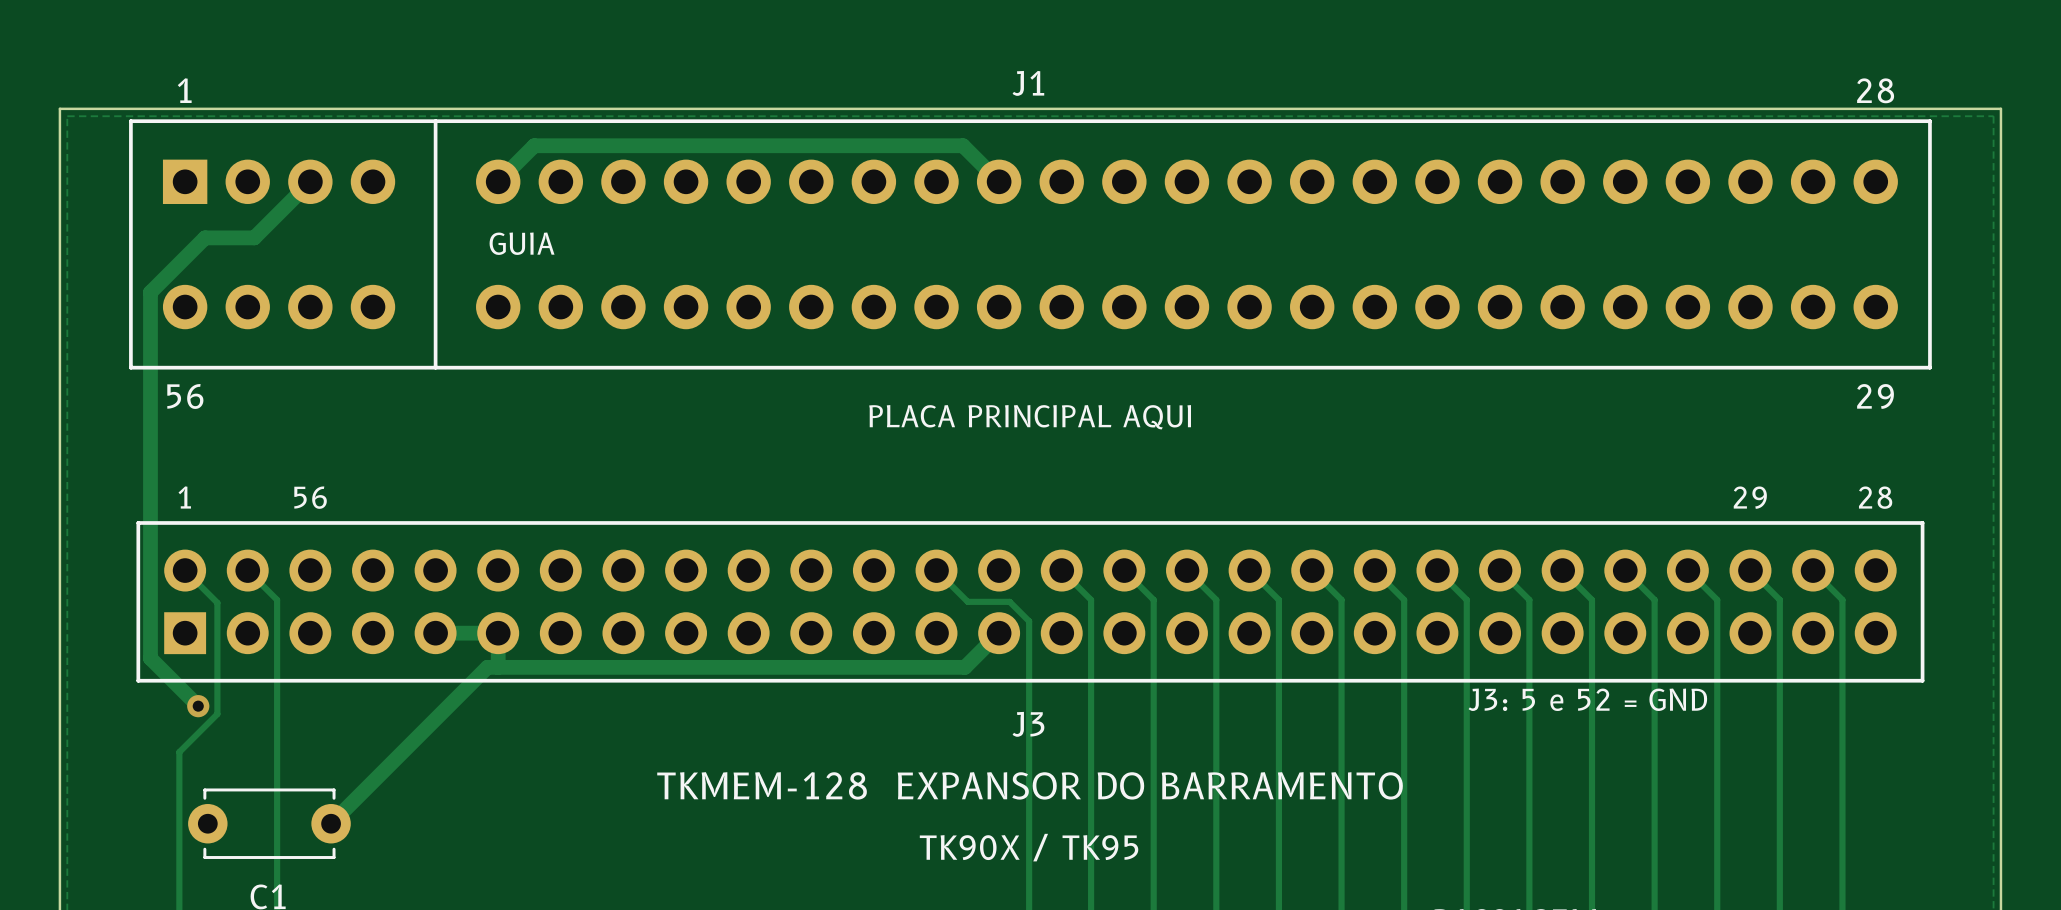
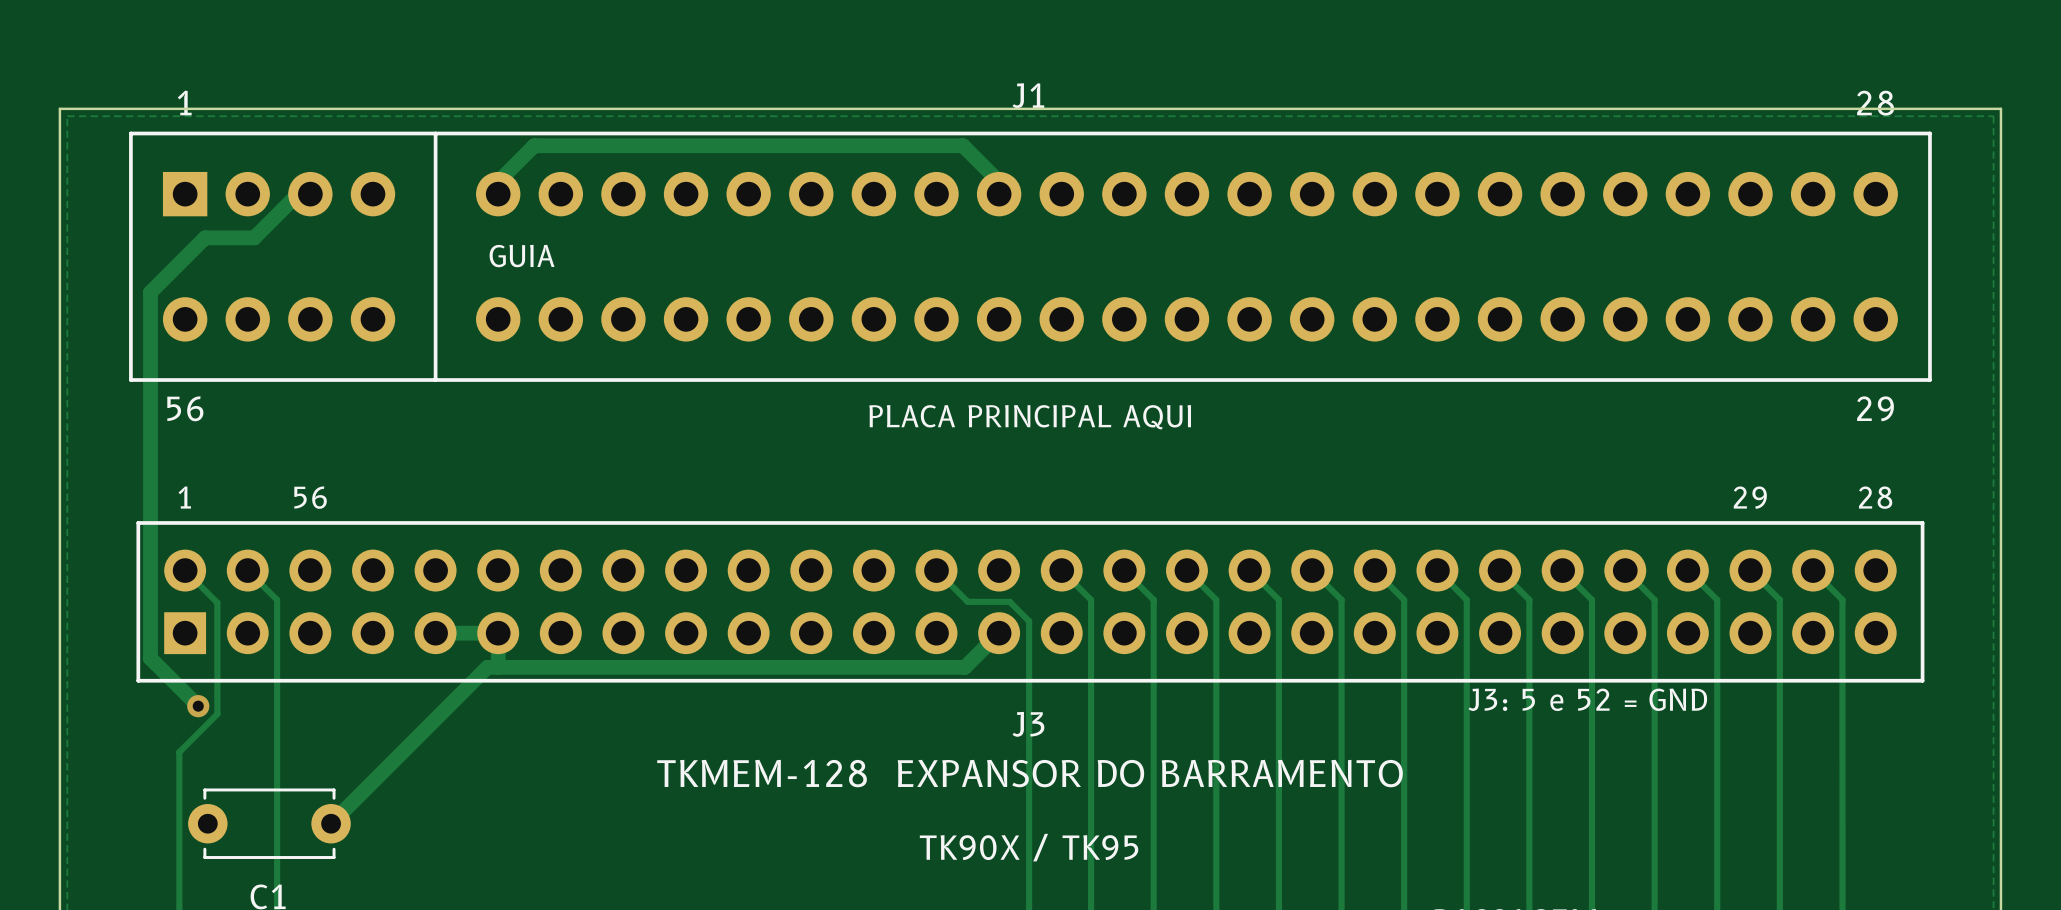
J1 position: (1030, 244) -> (1030, 256)
text position: TKMEM-128 EXPANSOR DO BARRAMENTO (1030, 785) -> TKMEM-128 EXPANSOR DO BARRAMENTO (1030, 773)

